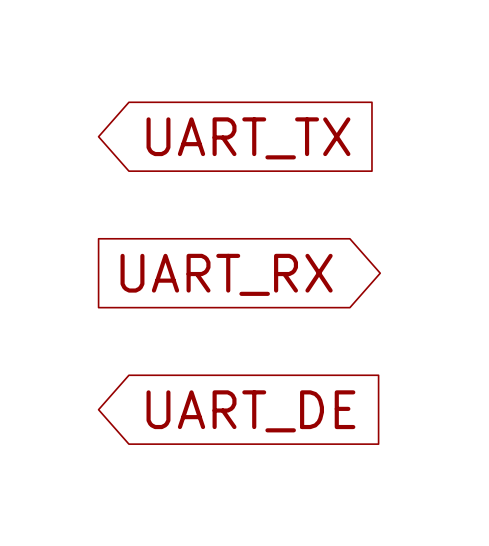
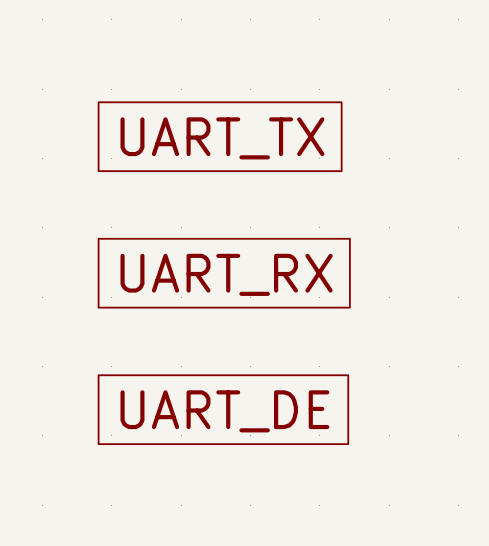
global label shape: input (248, 138) -> passive (222, 138)
global label shape: output (226, 274) -> passive (226, 274)
global label shape: input (250, 411) -> passive (224, 411)

